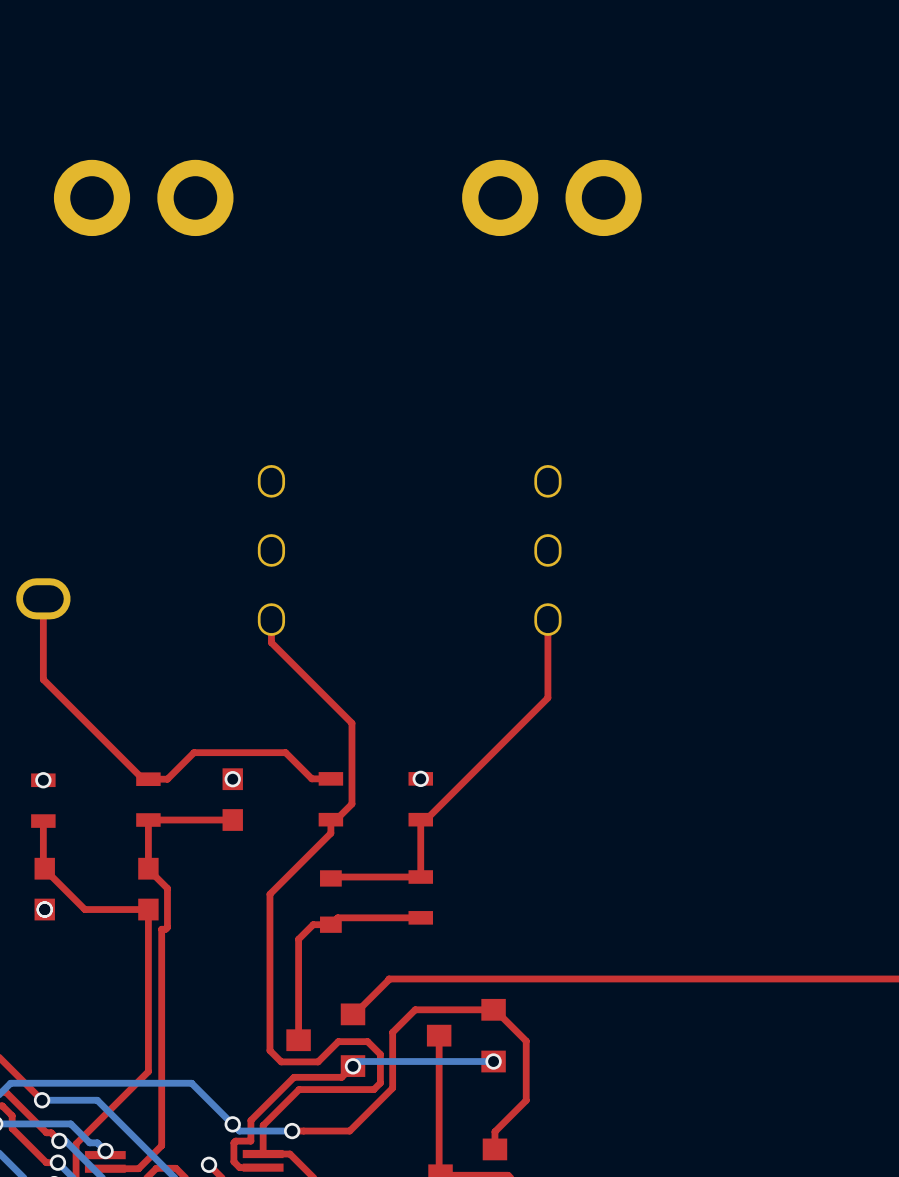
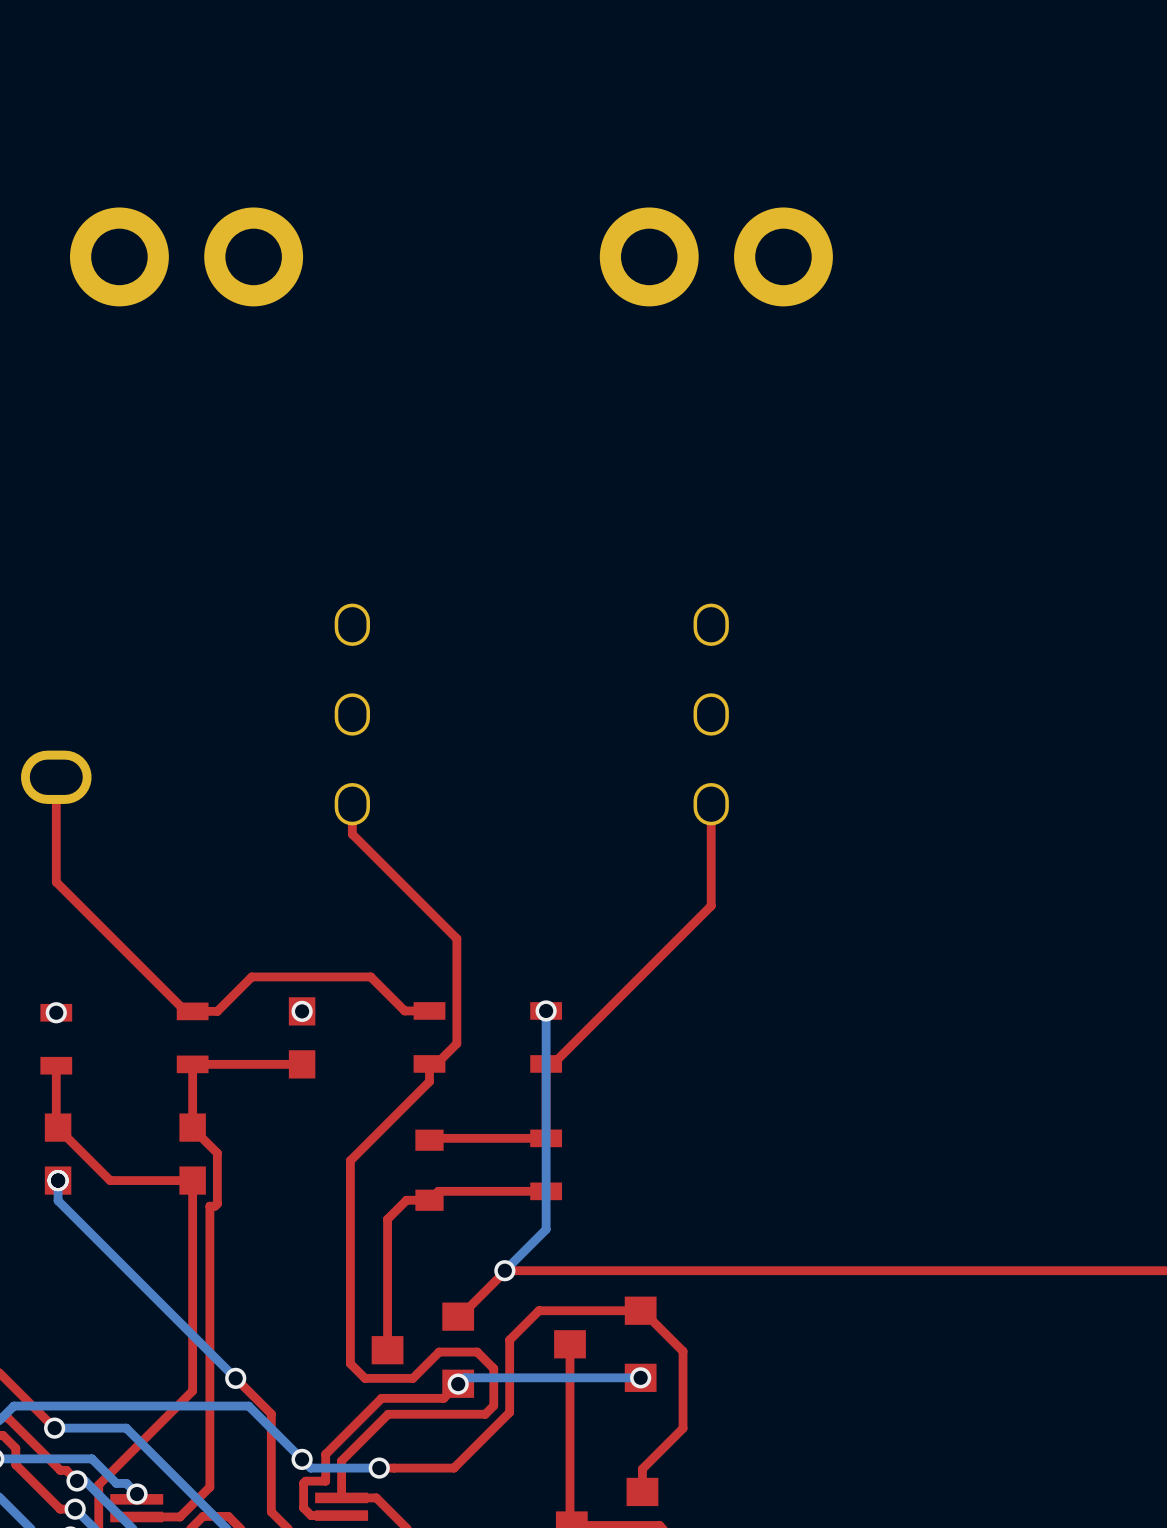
bottom track: none -> (546, 1010) (546, 1229) (504, 1270)
bottom track: none -> (58, 1180) (58, 1200) (235, 1378)
via: none -> (504, 1270)
top track: none -> (235, 1378) (271, 1413) (271, 1511)
via position: (209, 1164) -> (235, 1378)

